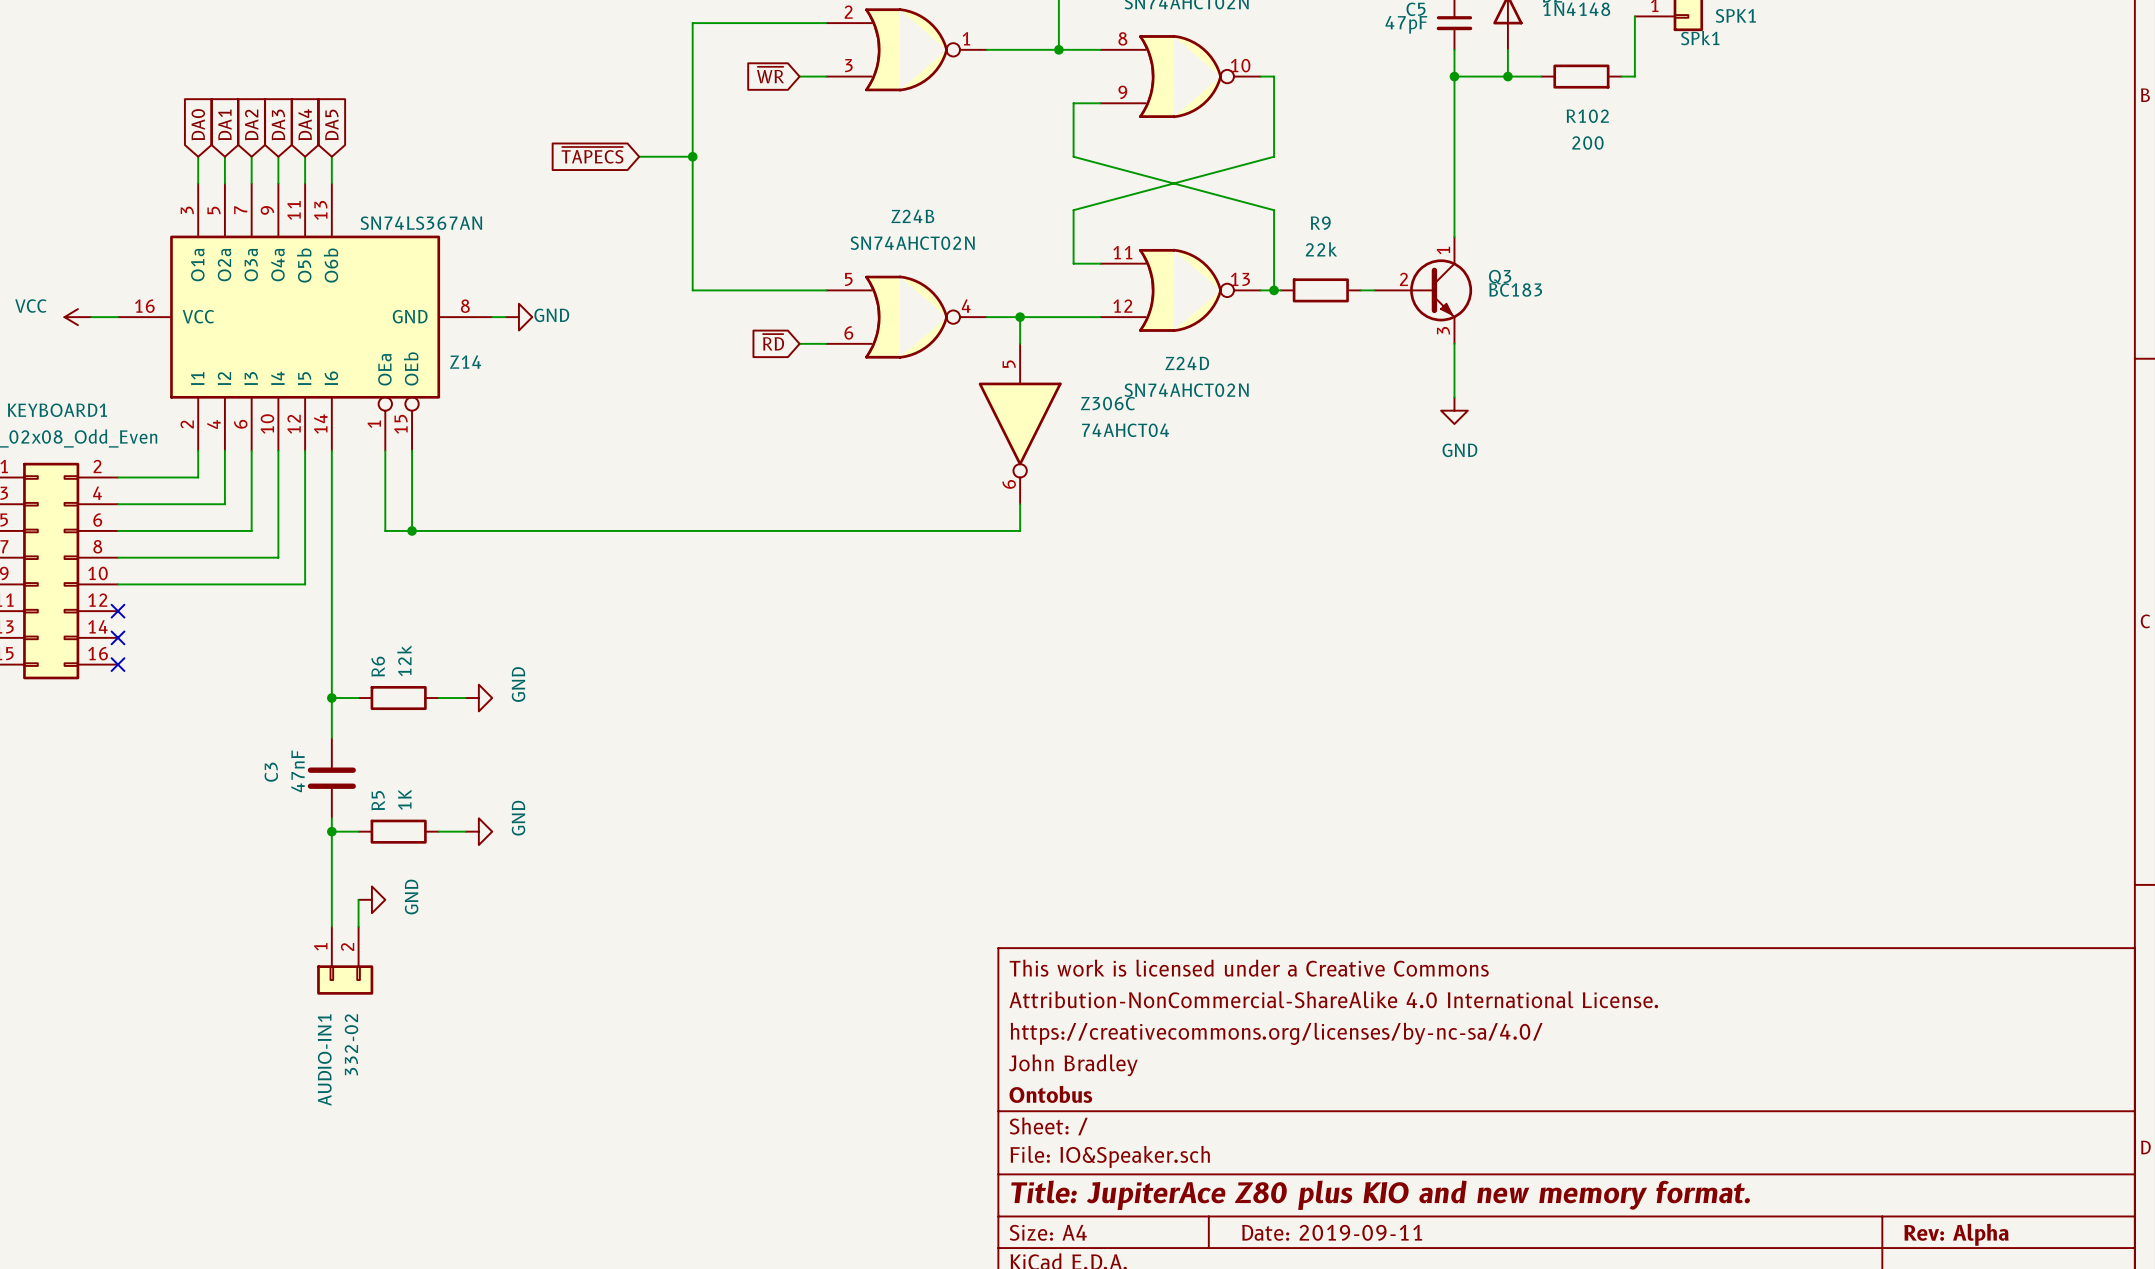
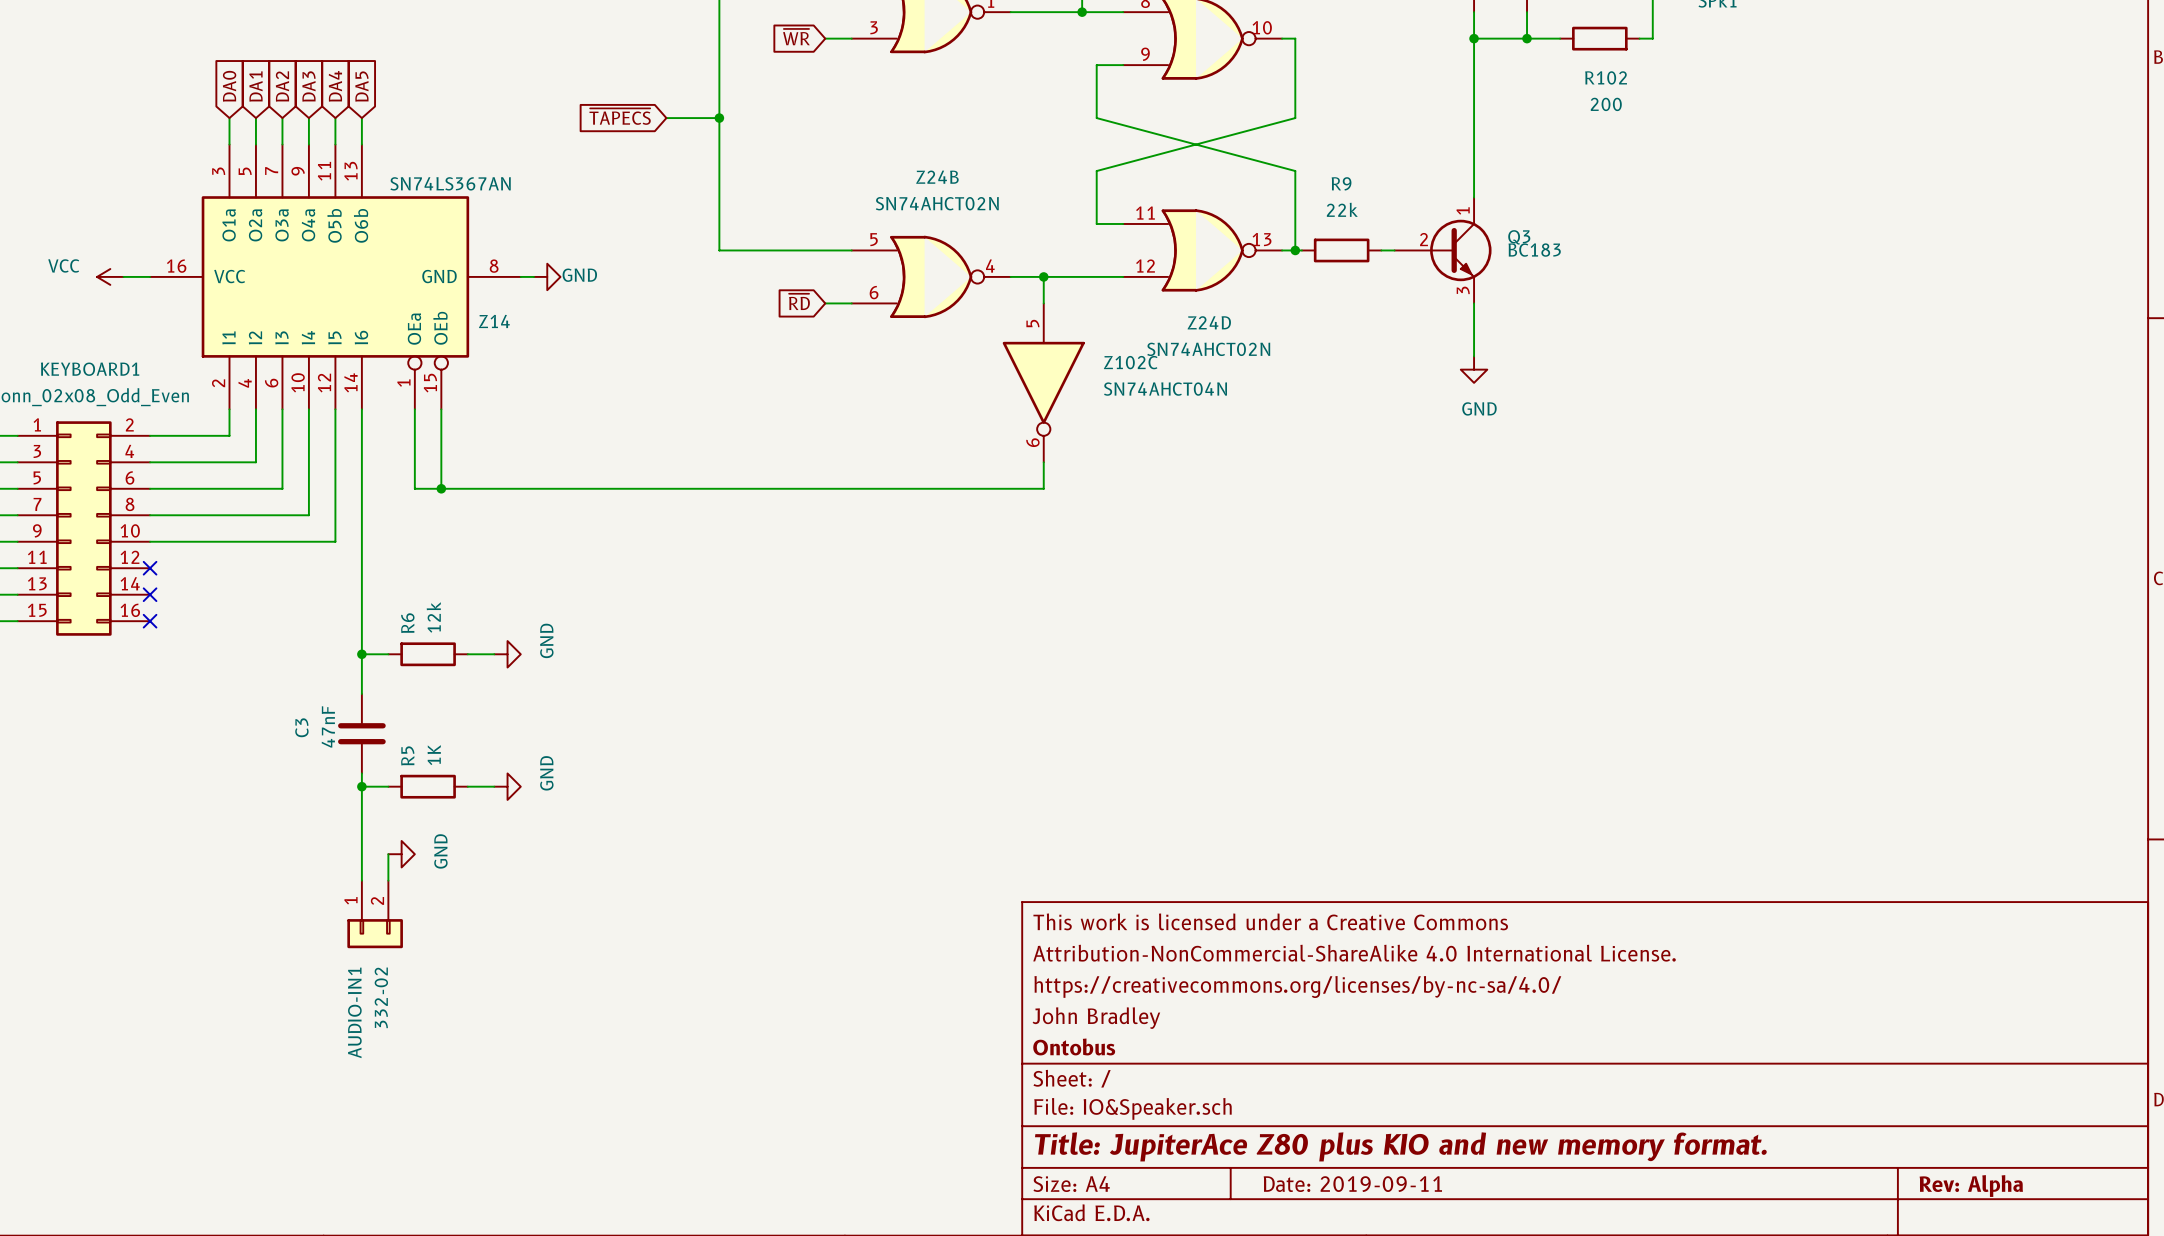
Z306C name: Z306C (1107, 403) -> Z102C (1130, 362)
Z306C value: 74AHCT04 (1125, 430) -> SN74AHCT04N (1165, 389)

